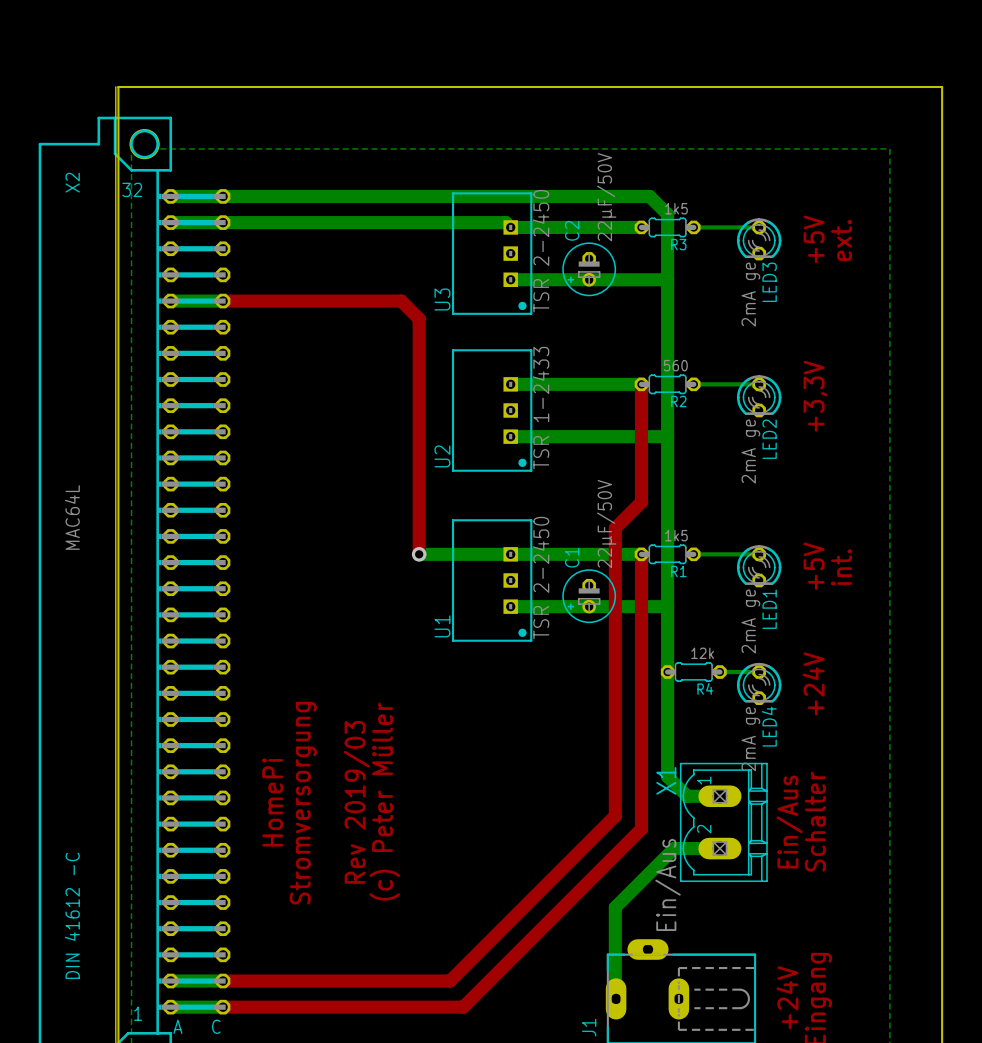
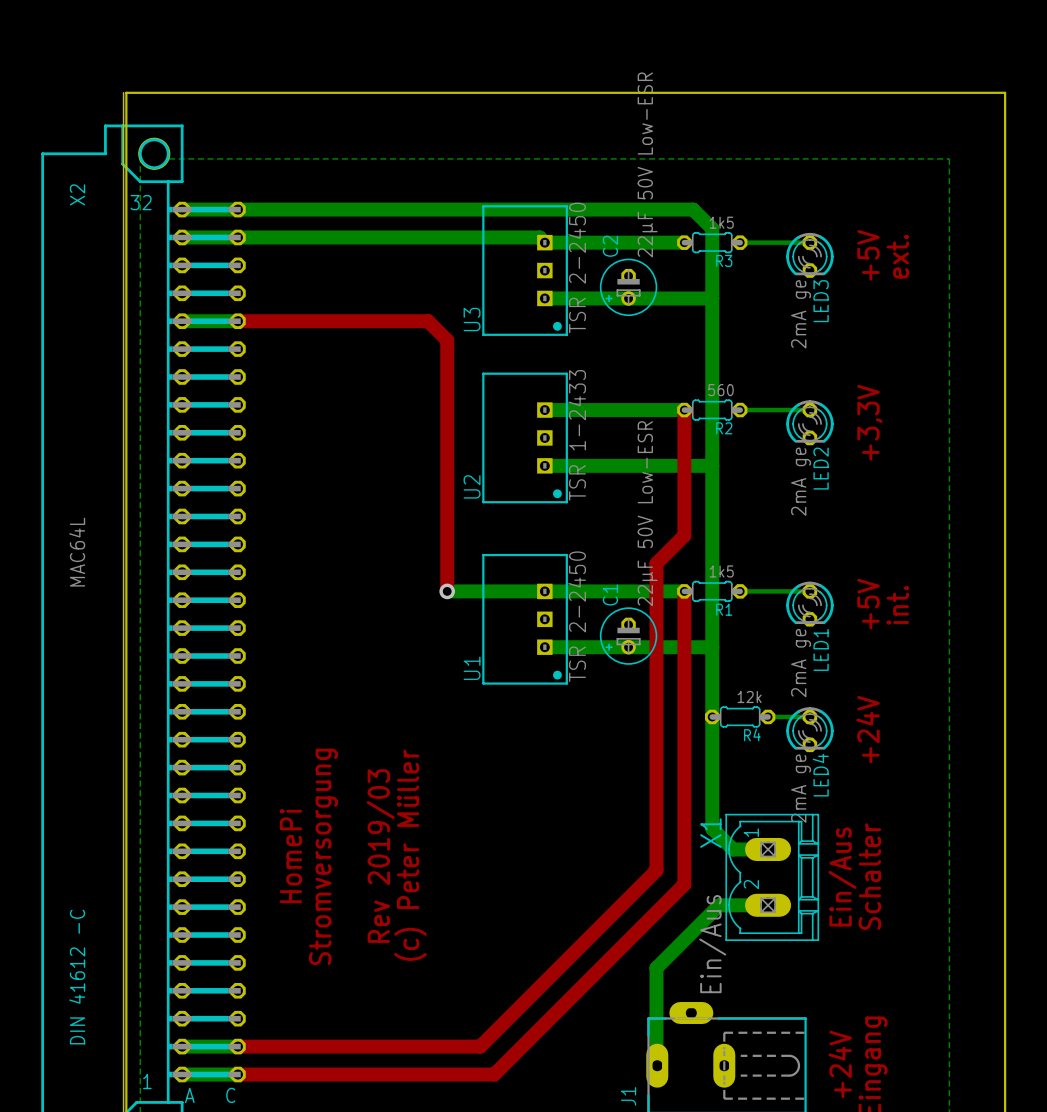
C2 value: 22µF/50V (606, 197) -> 22µF 50V Low-ESR (647, 164)
C1 value: 22µF/50V (606, 524) -> 22µF 50V Low-ESR (647, 513)

